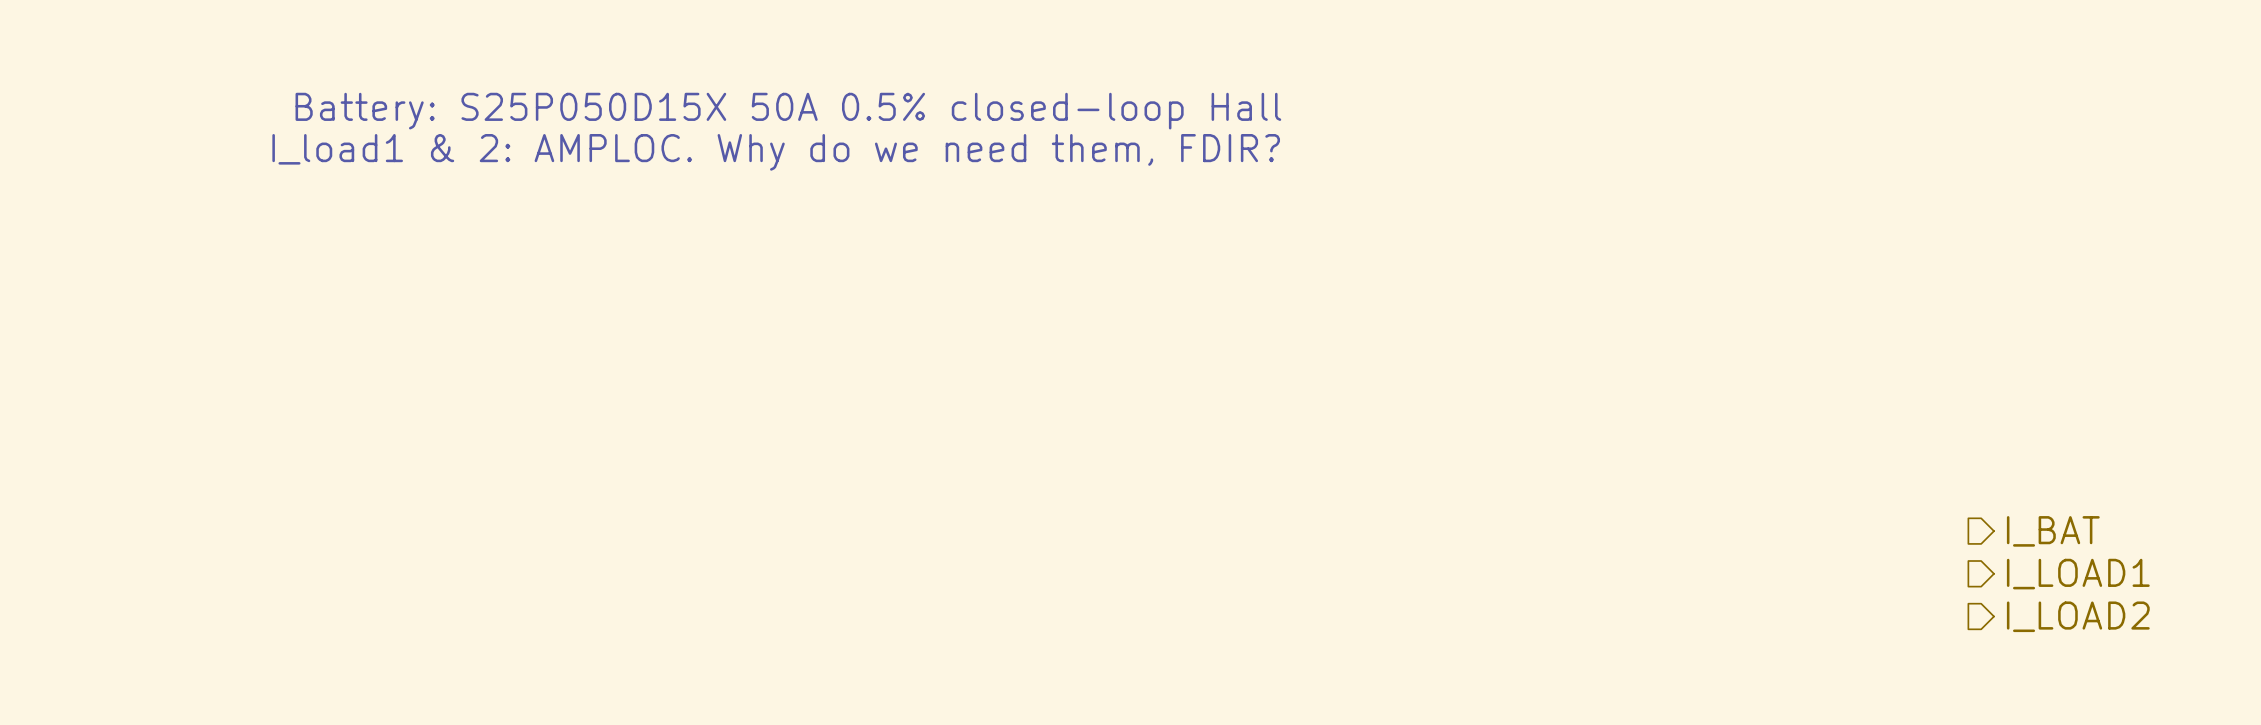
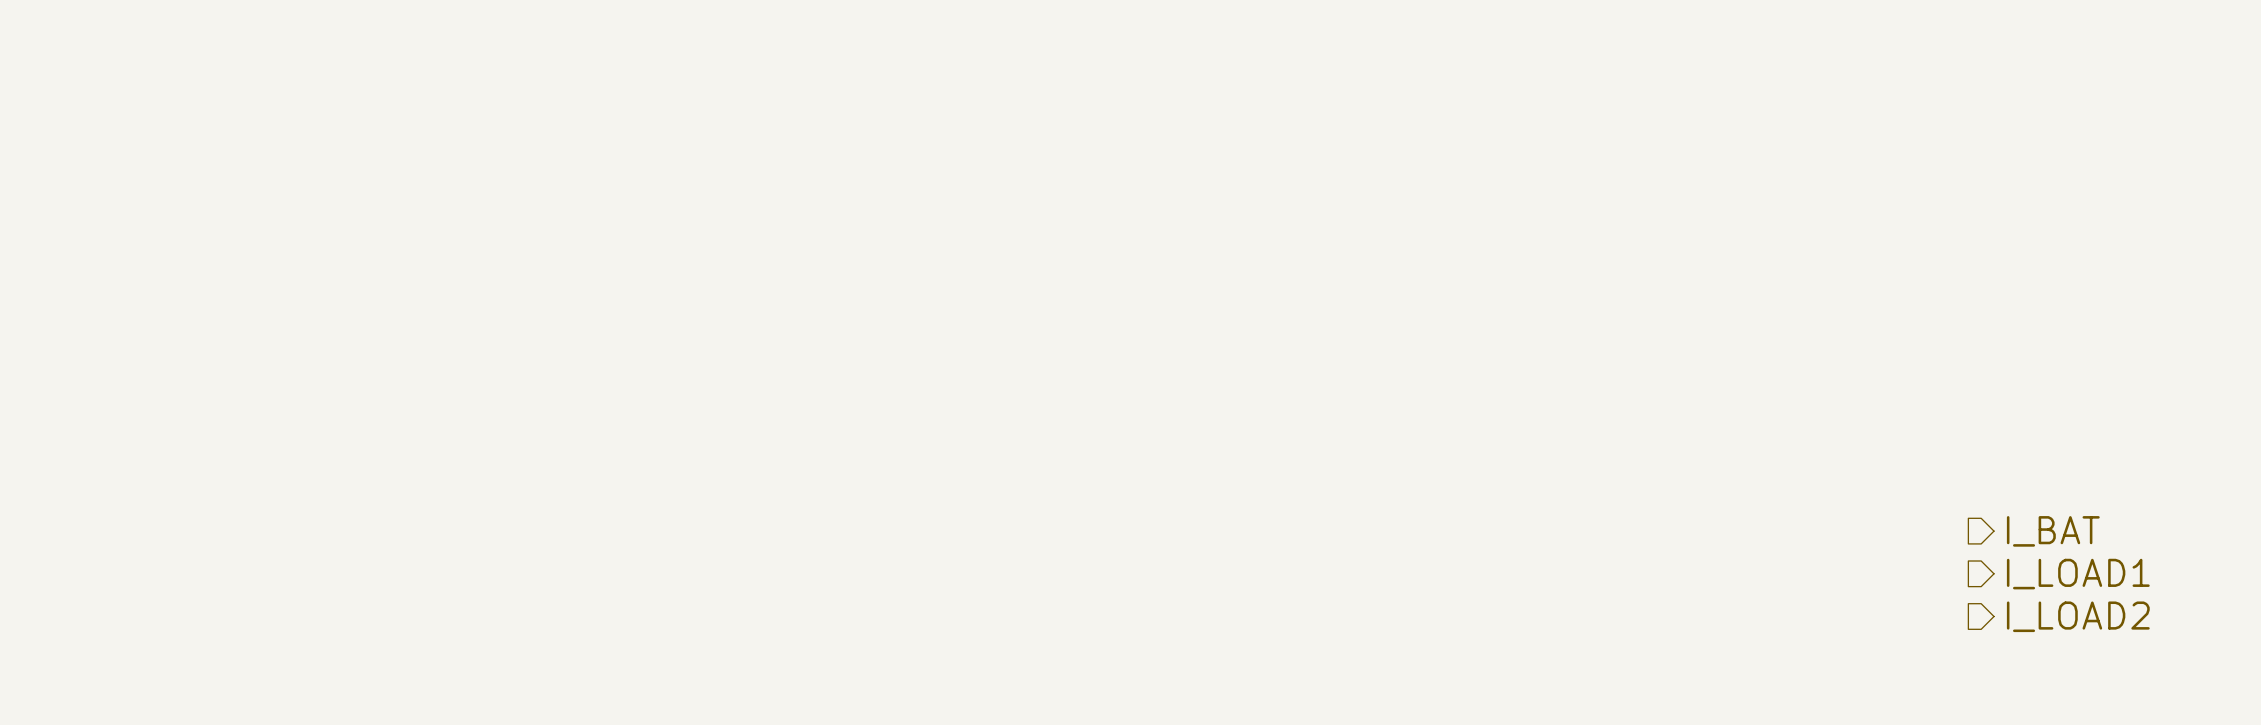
text: Battery: S25P050D15X 50A 0.5% closed-loop Hall (788, 111) -> none
text: I_load1 & 2: AMPLOC. Why do we need them, FDIR? (776, 152) -> none

